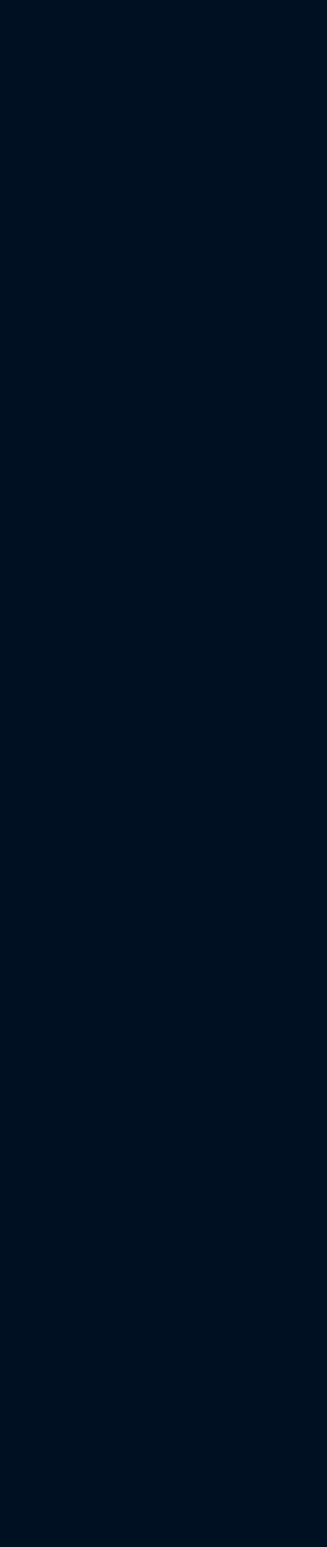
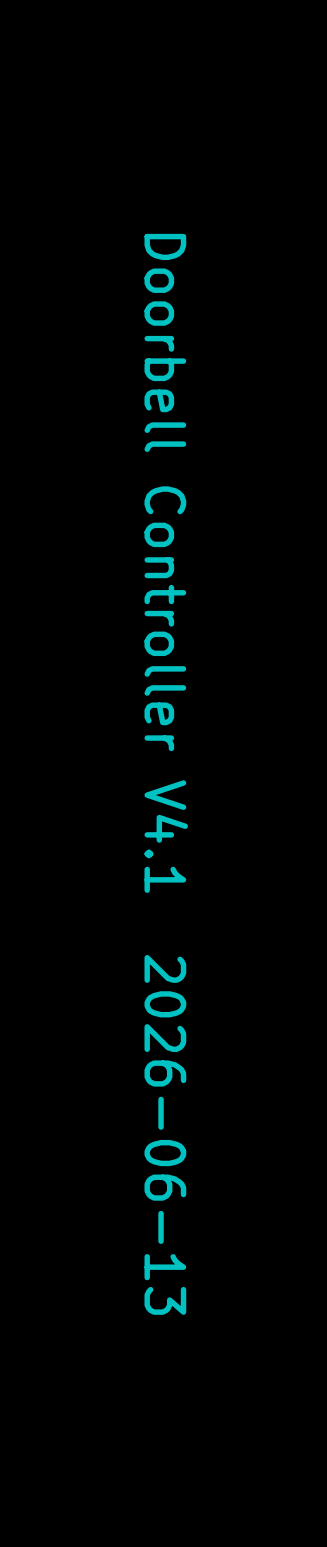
text: none -> Doorbell Controller V4.1 2026-06-13 (166, 774)

